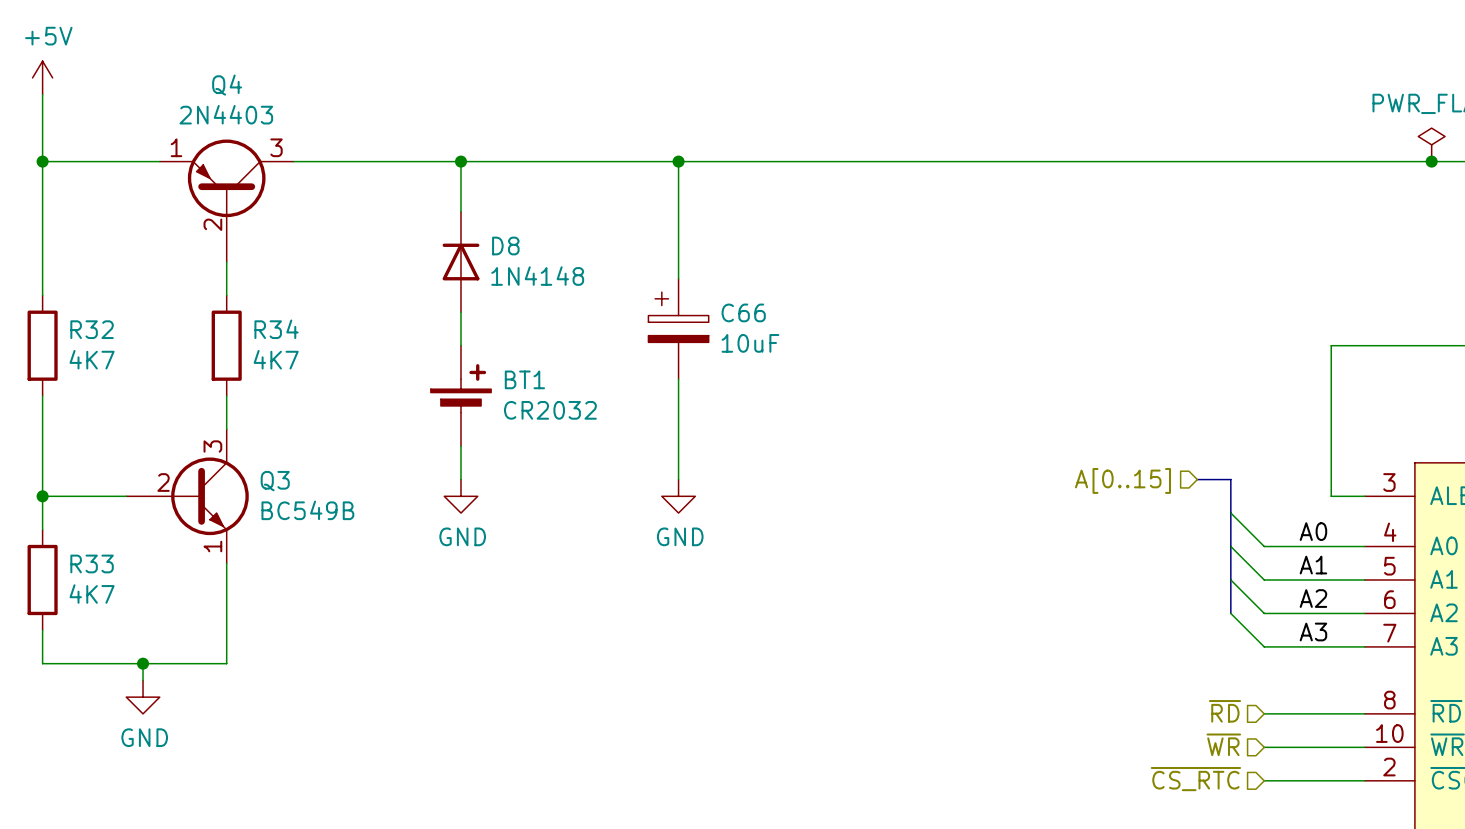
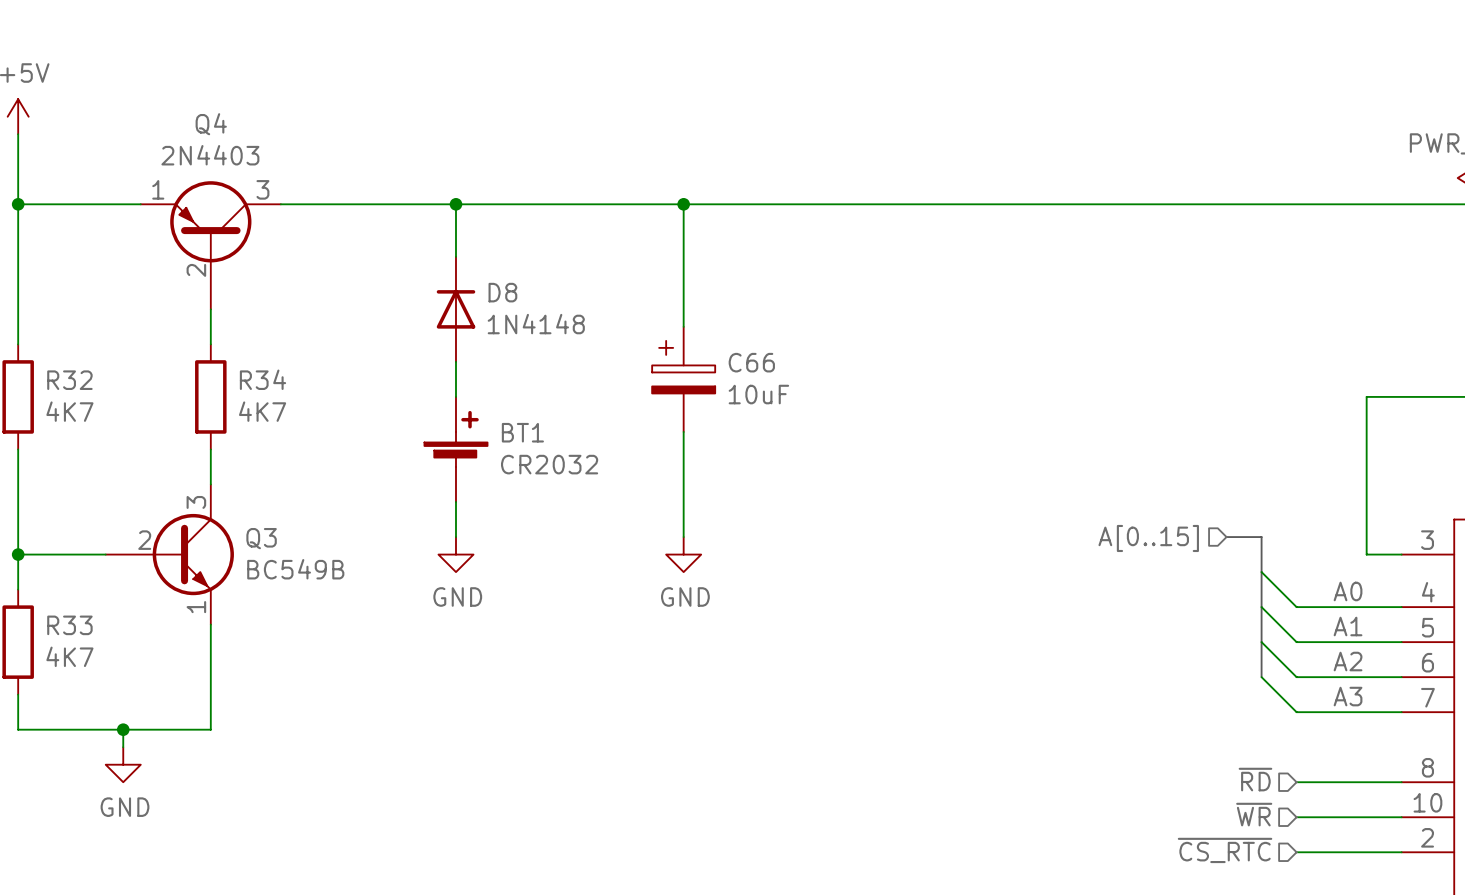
BT1 symbol: [430, 345, 492, 447] -> [424, 396, 488, 503]

